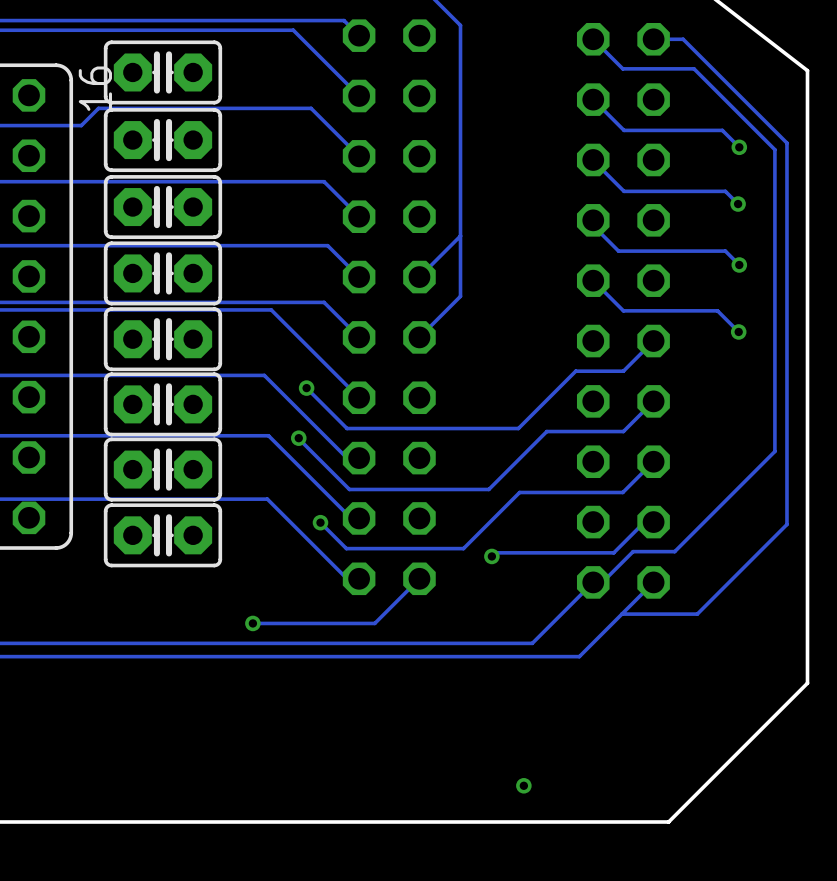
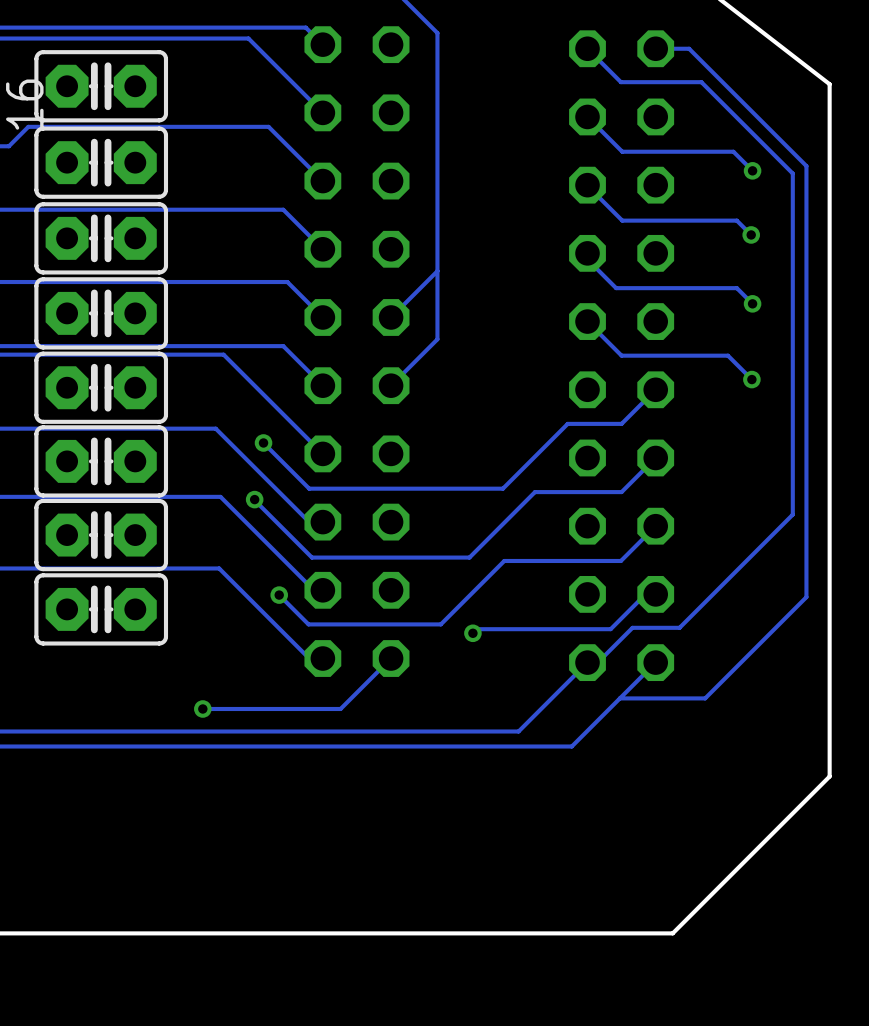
via: (523, 785) -> none

